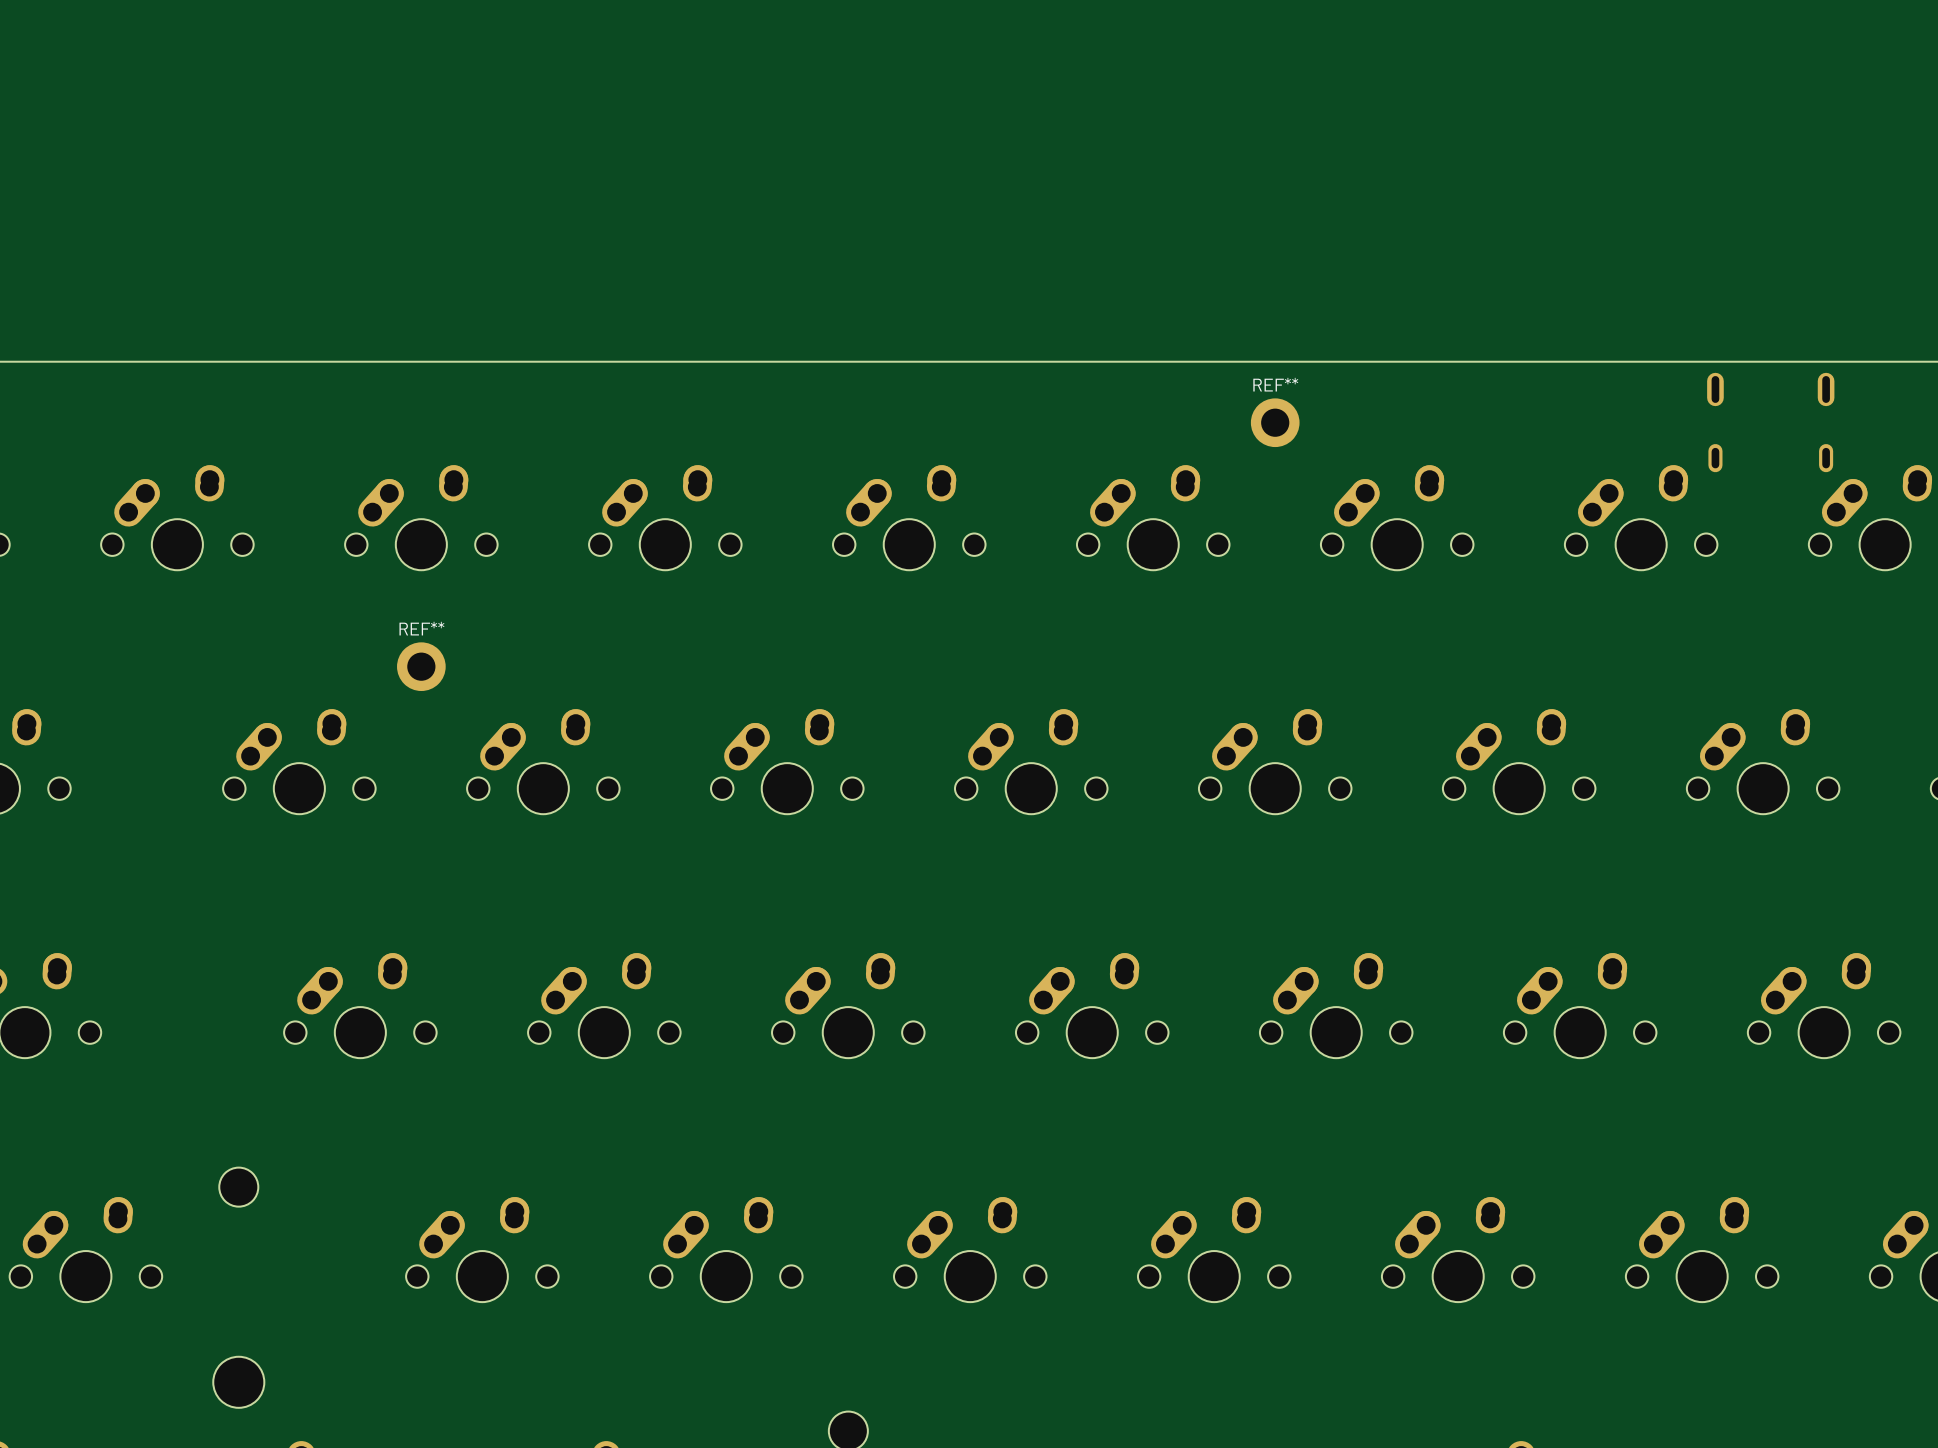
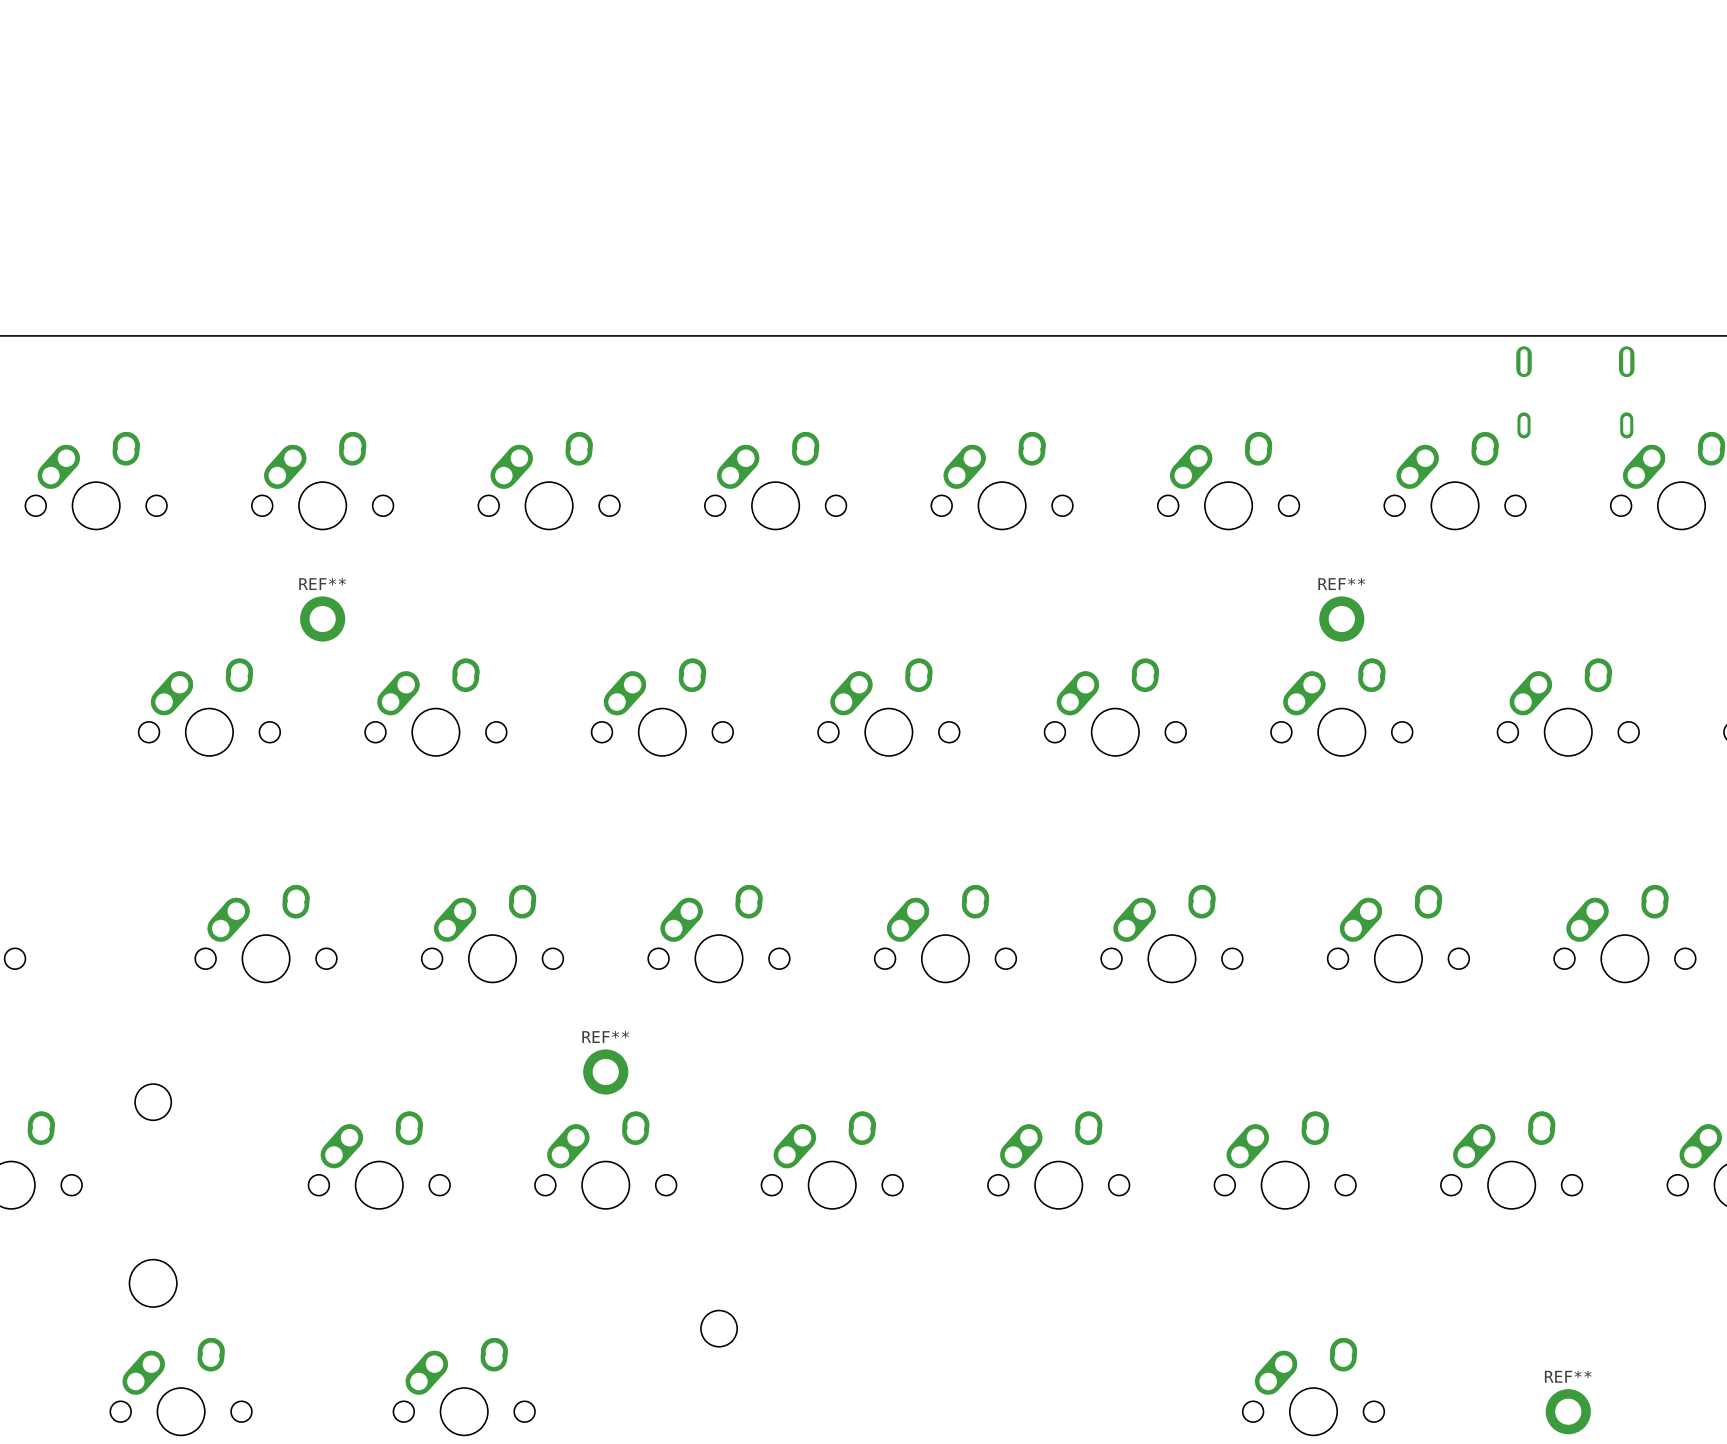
REF**: (1275, 422) -> none
REF**: none -> (1341, 619)
REF**: none -> (605, 1071)

